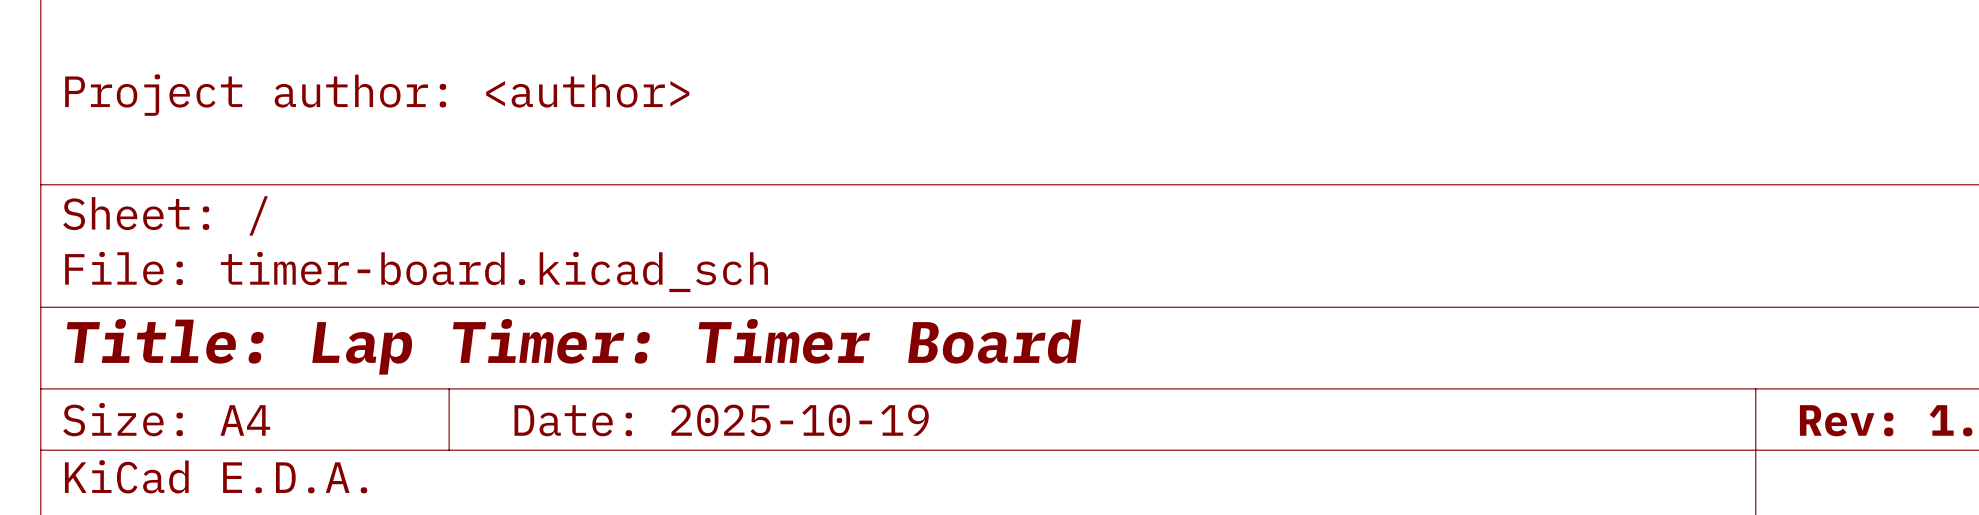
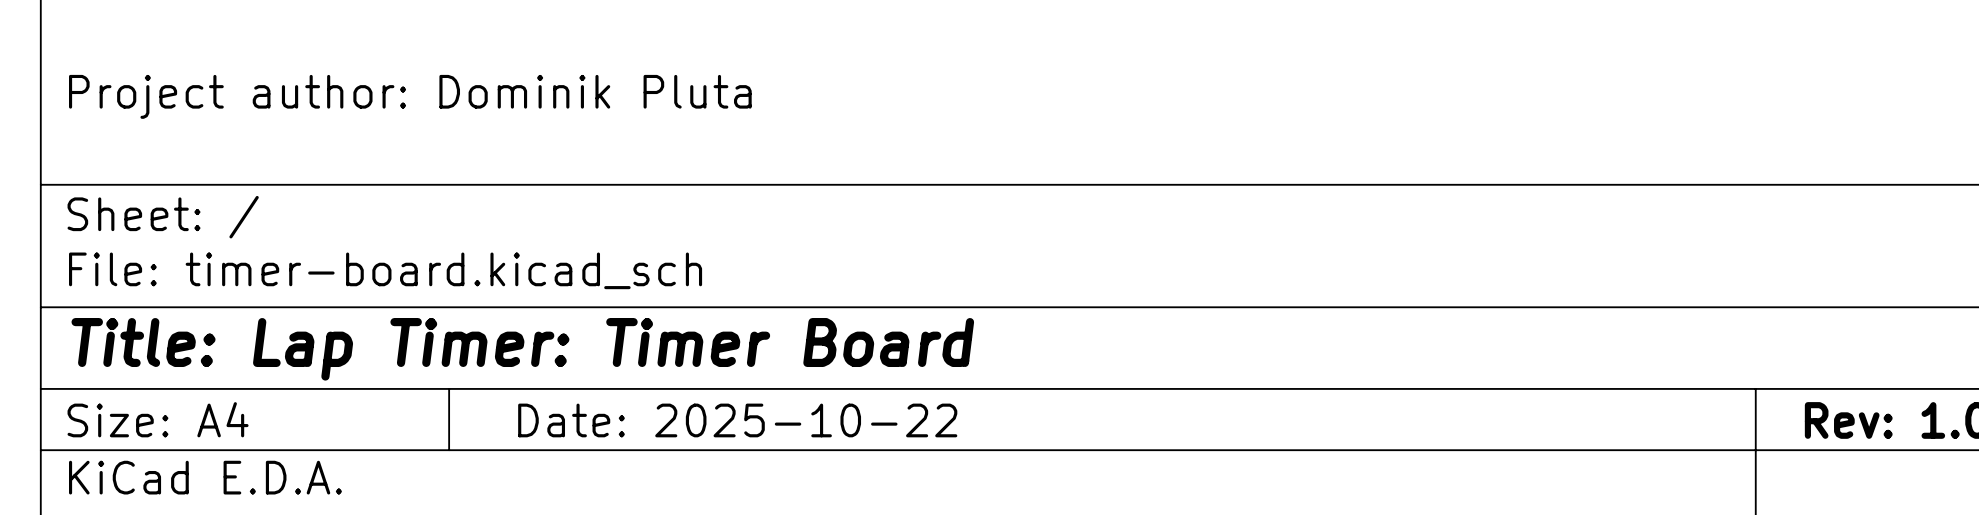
title block: Project author: <author> (377, 95) -> Project author: Dominik Pluta (410, 96)
title block: Date: 2025-10-19 (721, 420) -> Date: 2025-10-22 (737, 420)

